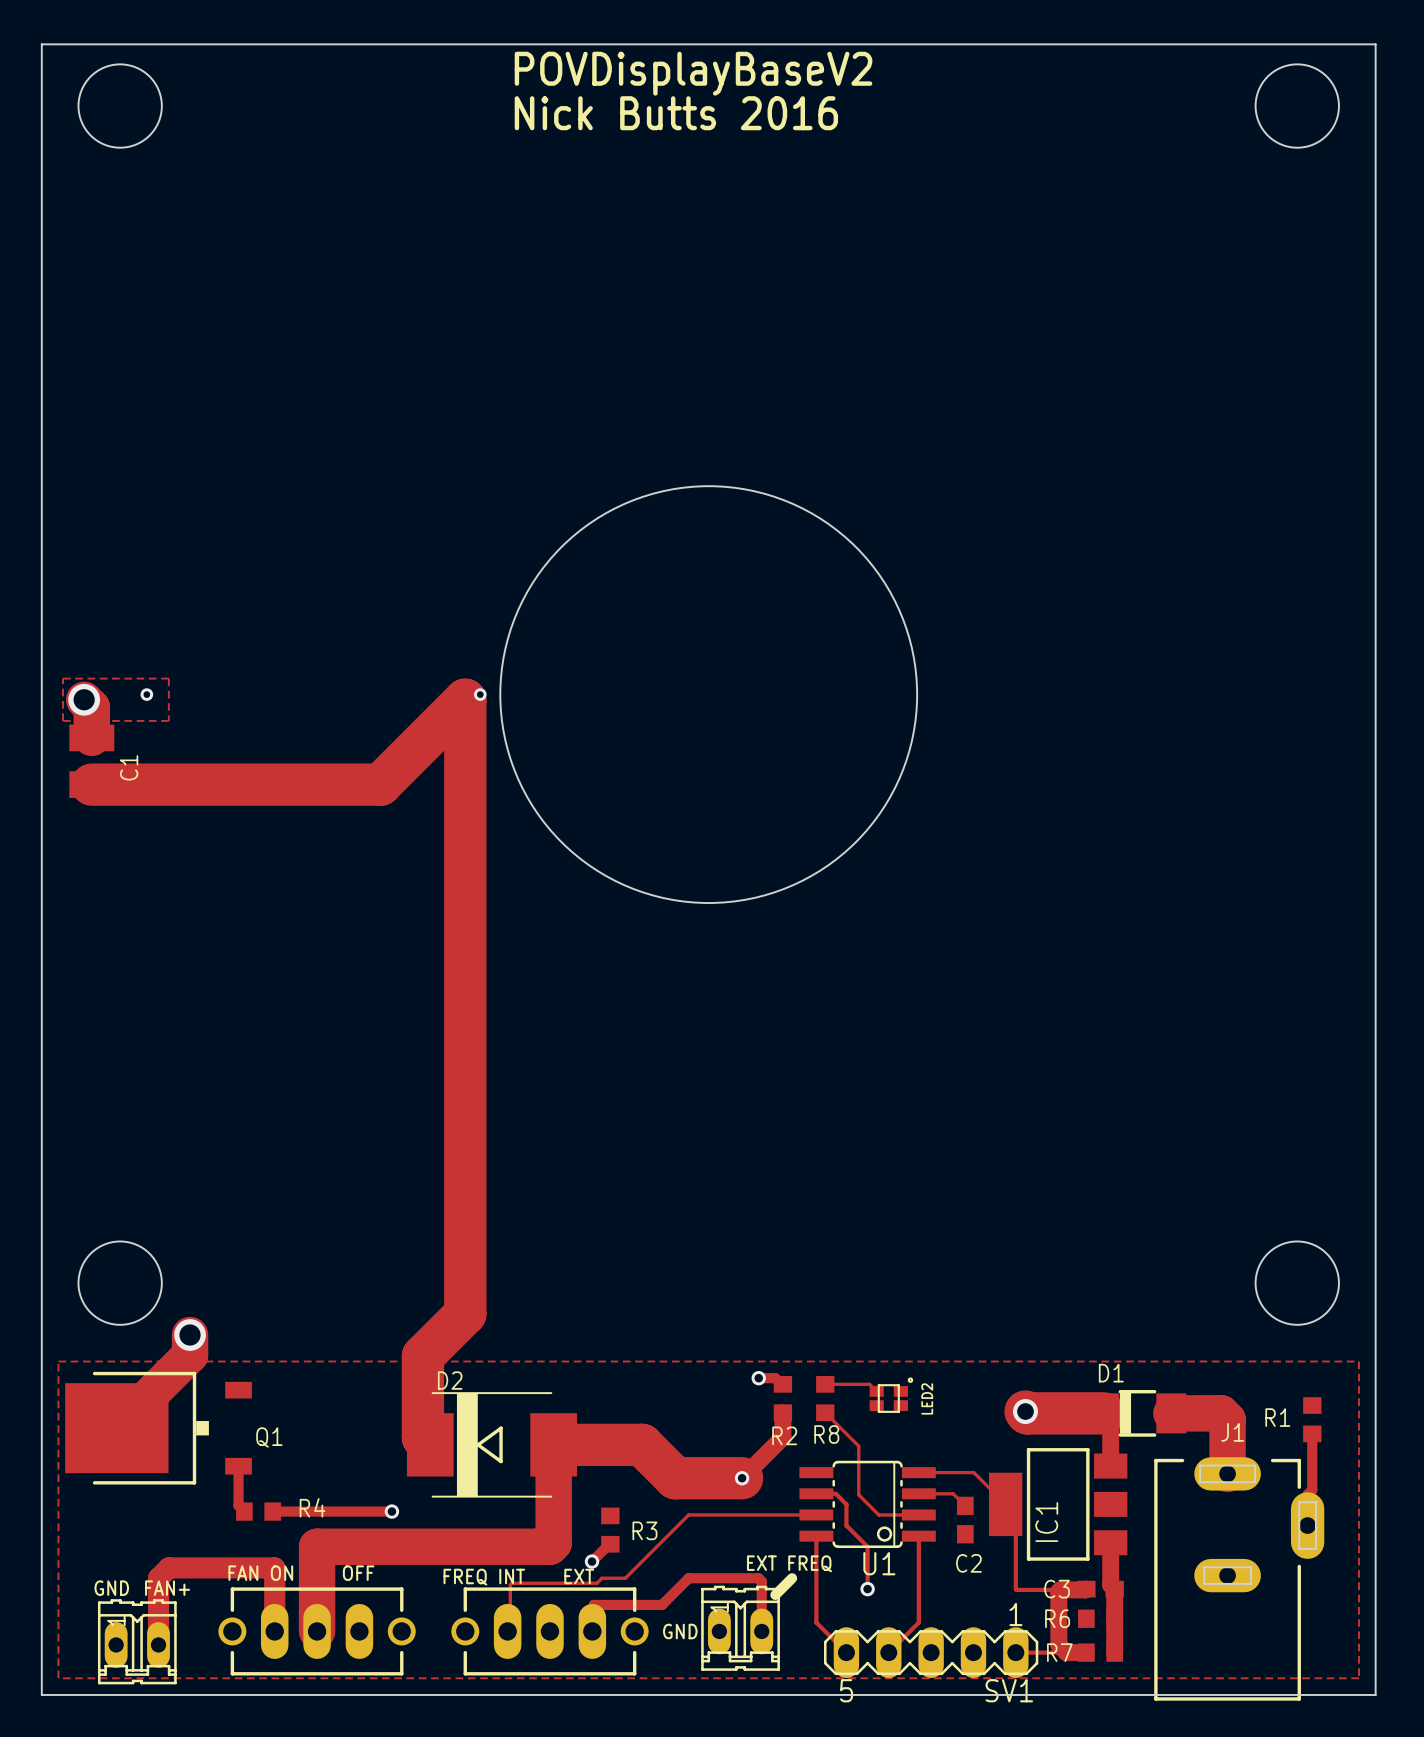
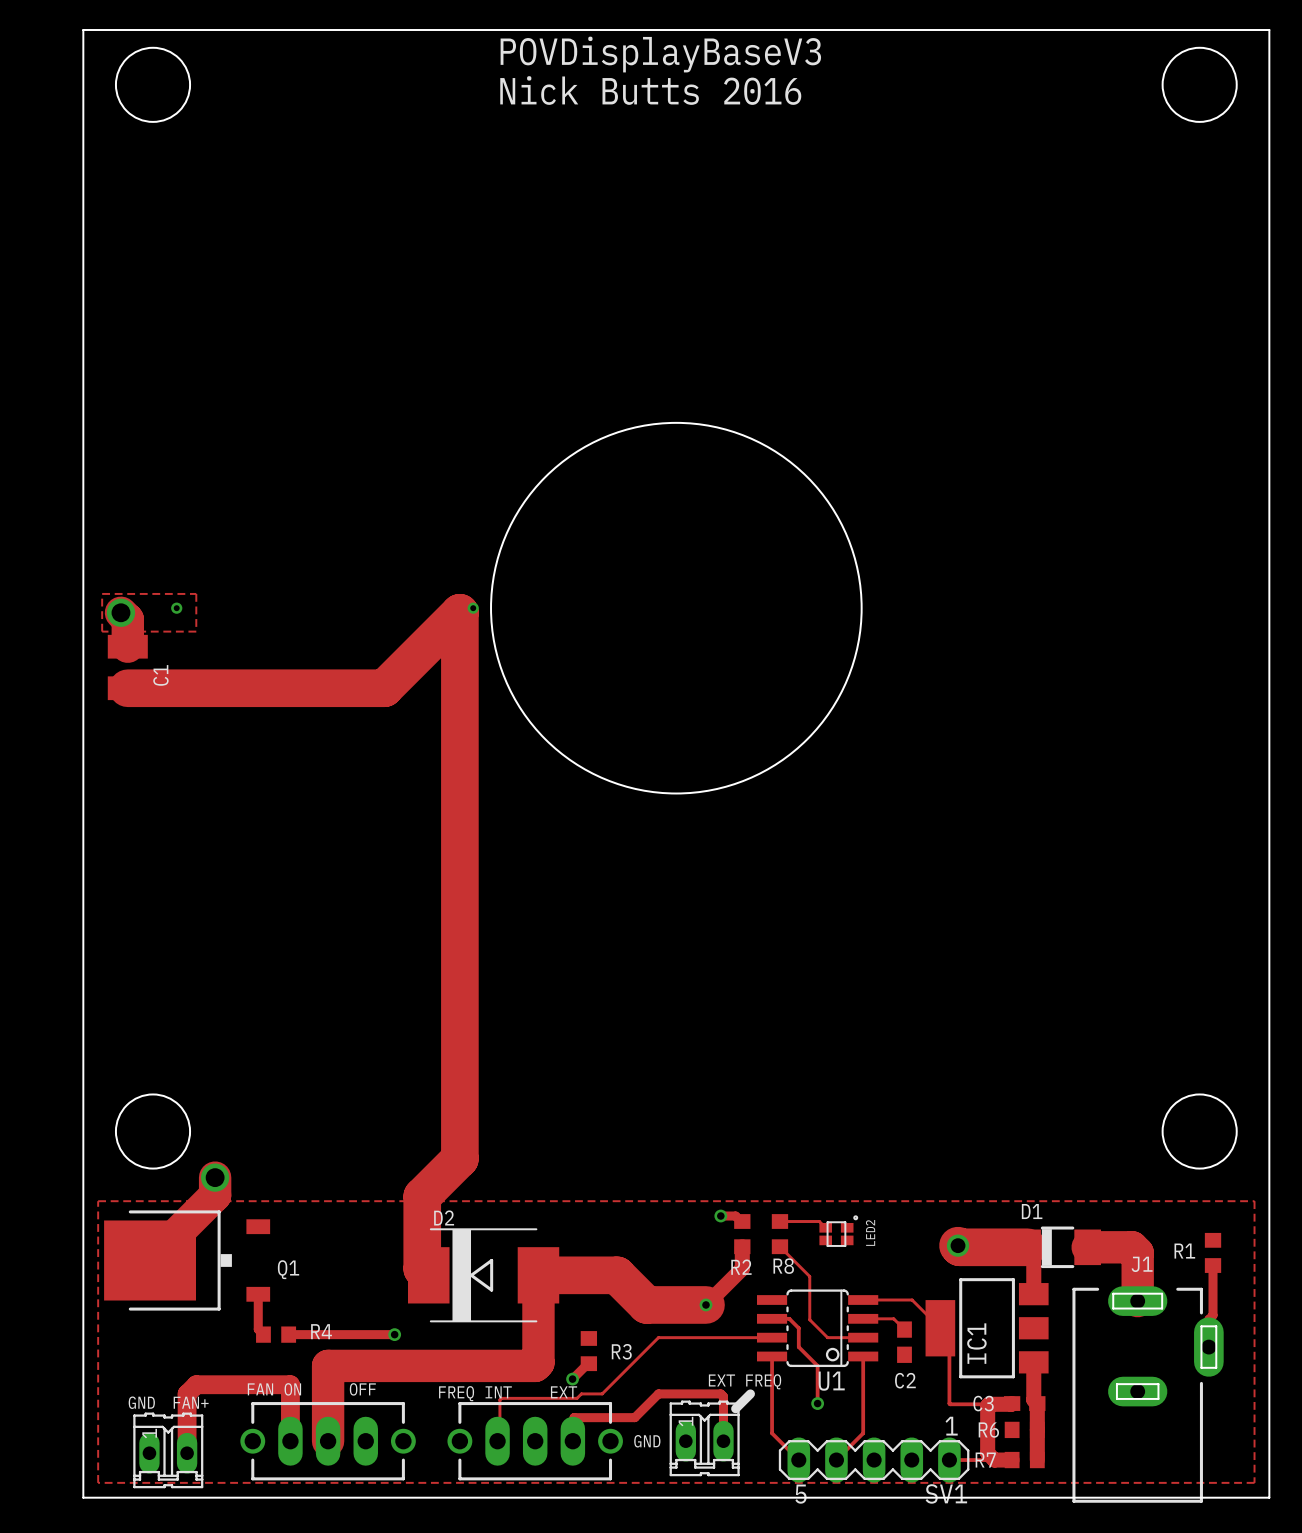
text: POVDisplayBaseV2 (693, 73) -> POVDisplayBaseV3 (660, 54)

